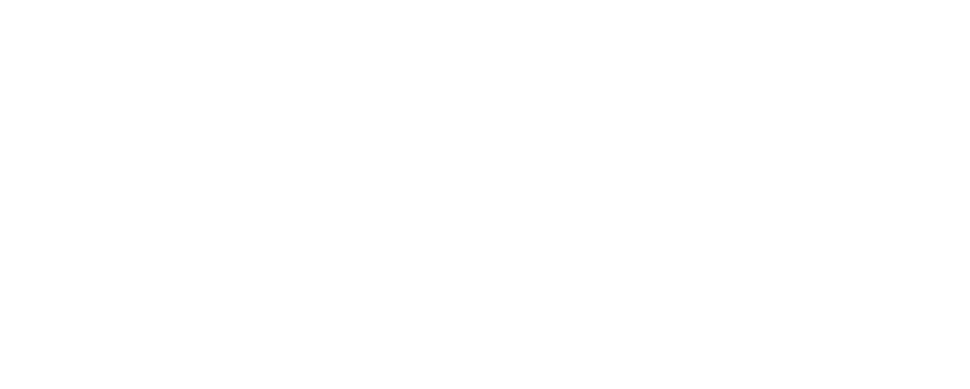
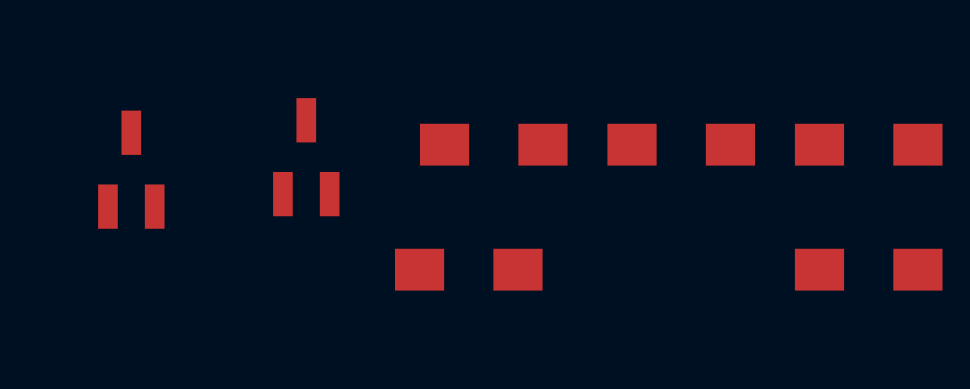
part: none -> (493, 144)
part: none -> (681, 144)
part: none -> (868, 144)
part: none -> (306, 157)
part: none -> (131, 169)
part: none -> (468, 269)
part: none -> (868, 269)

